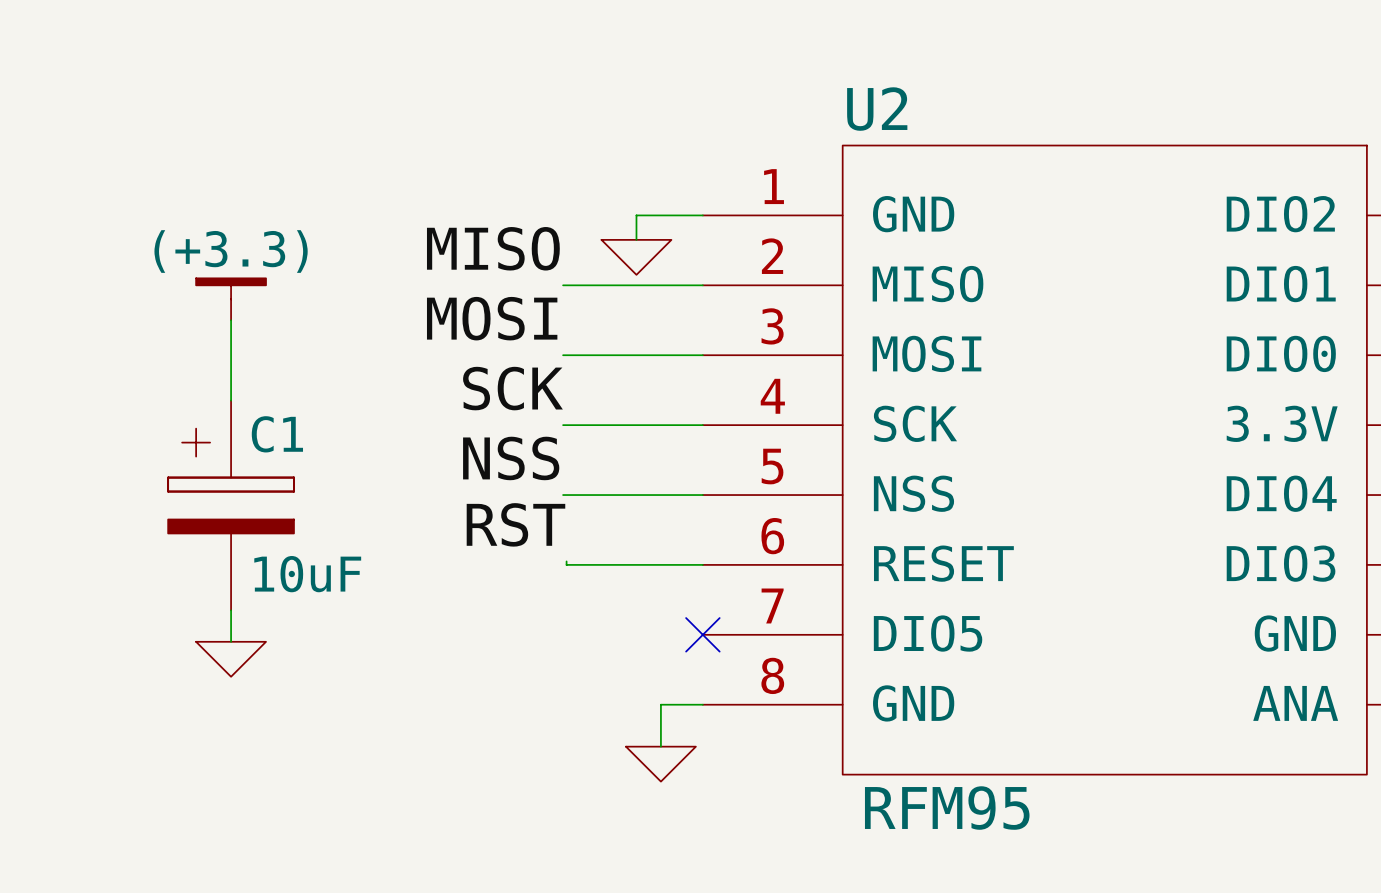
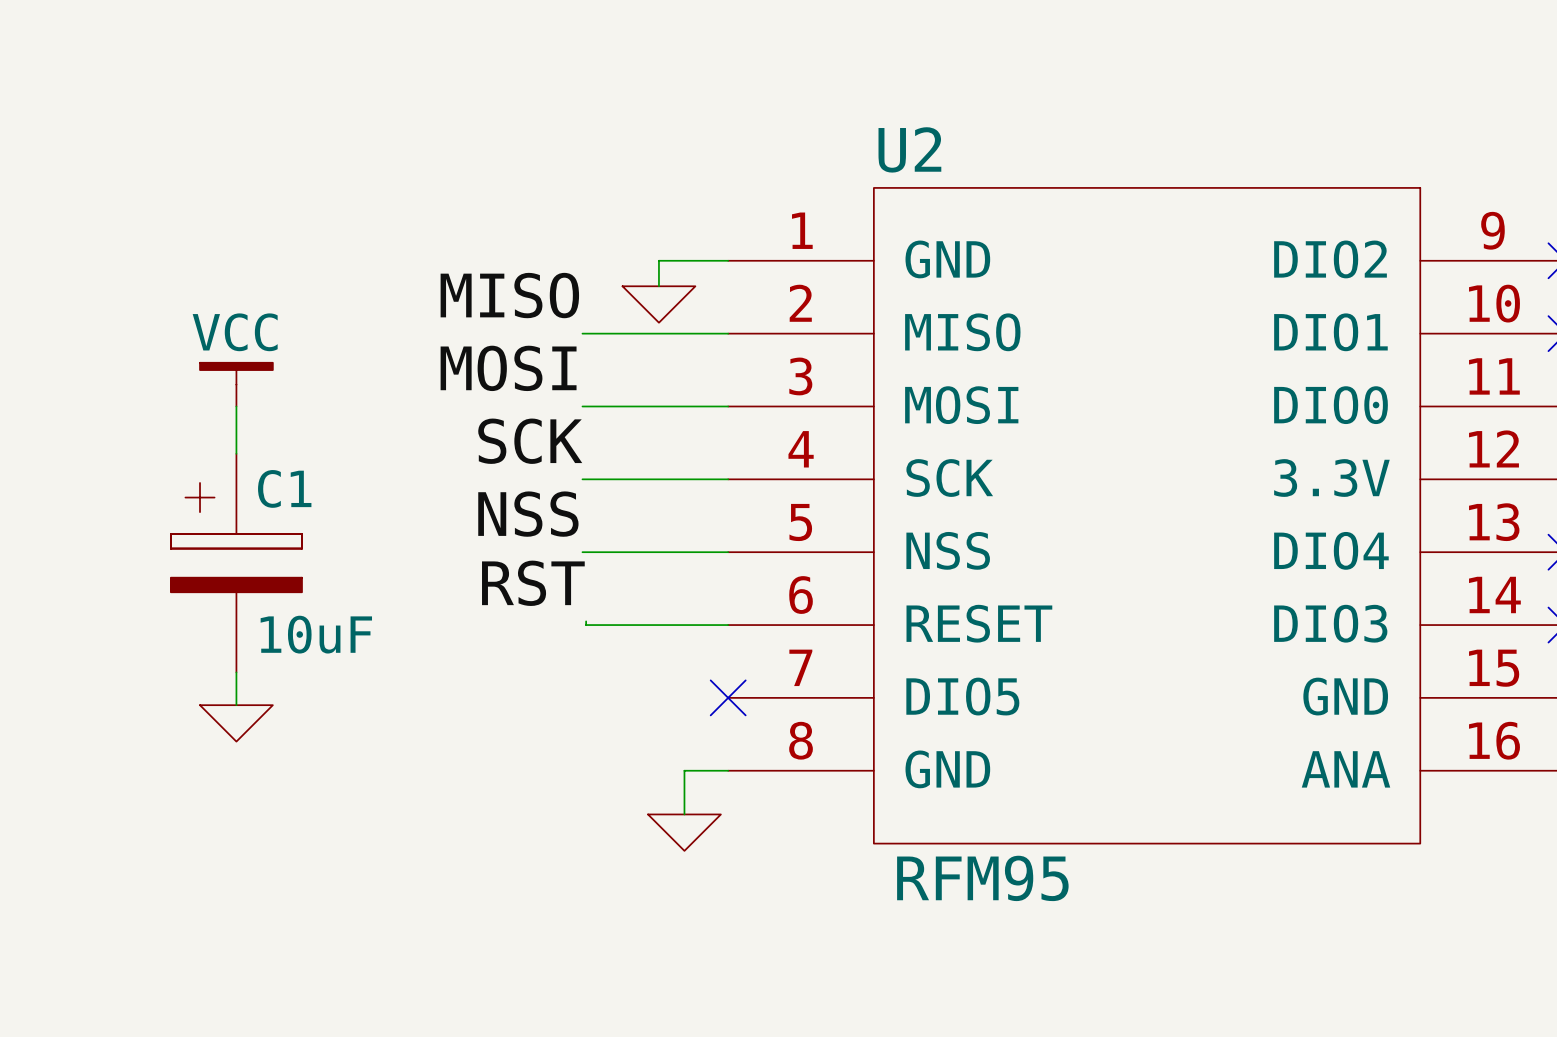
power symbol: (+3.3) (231, 299) -> none
power symbol: none -> VCC (236, 384)

